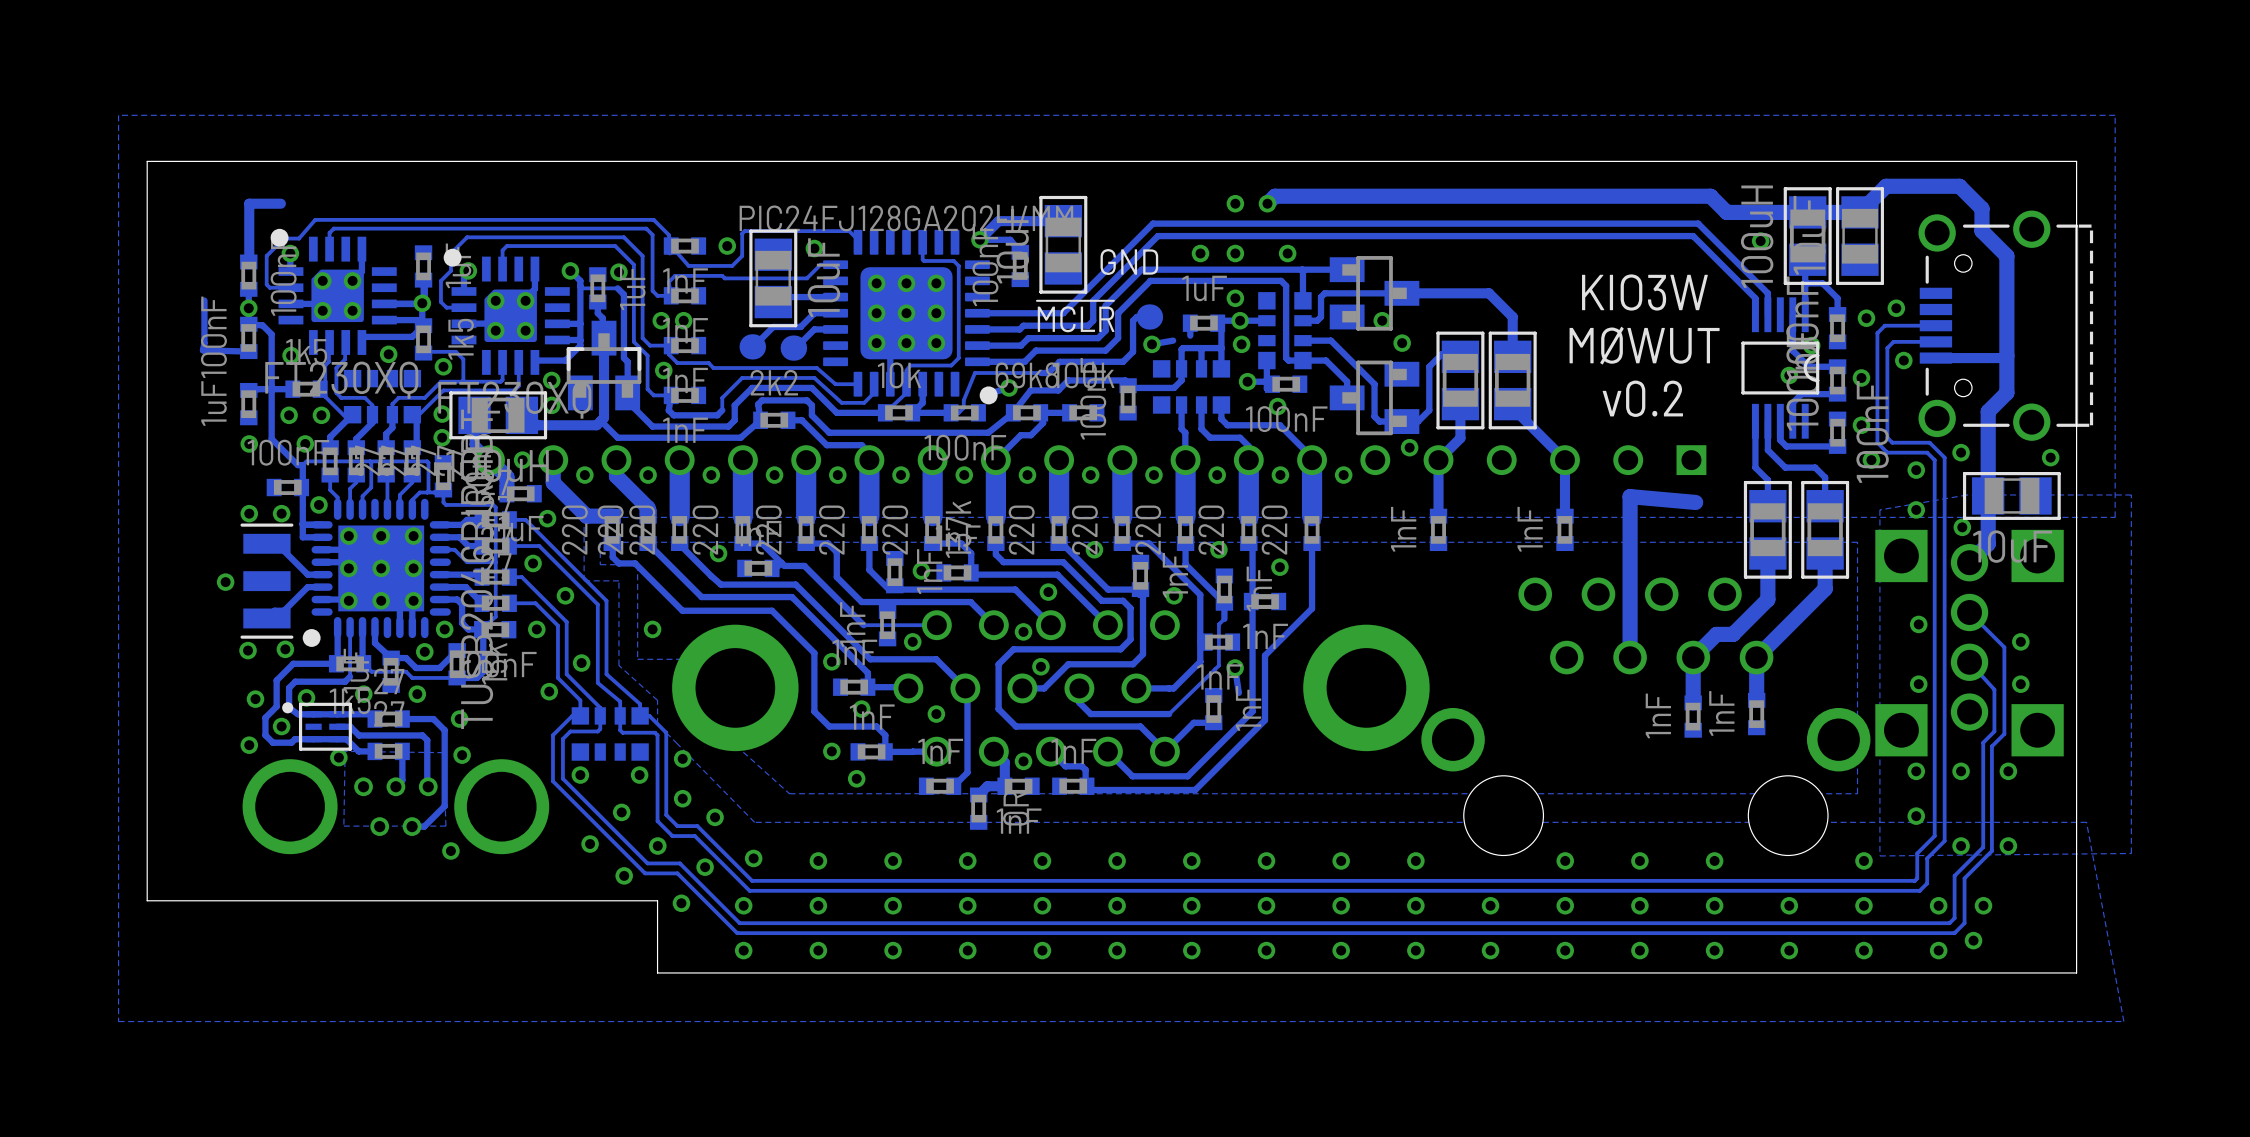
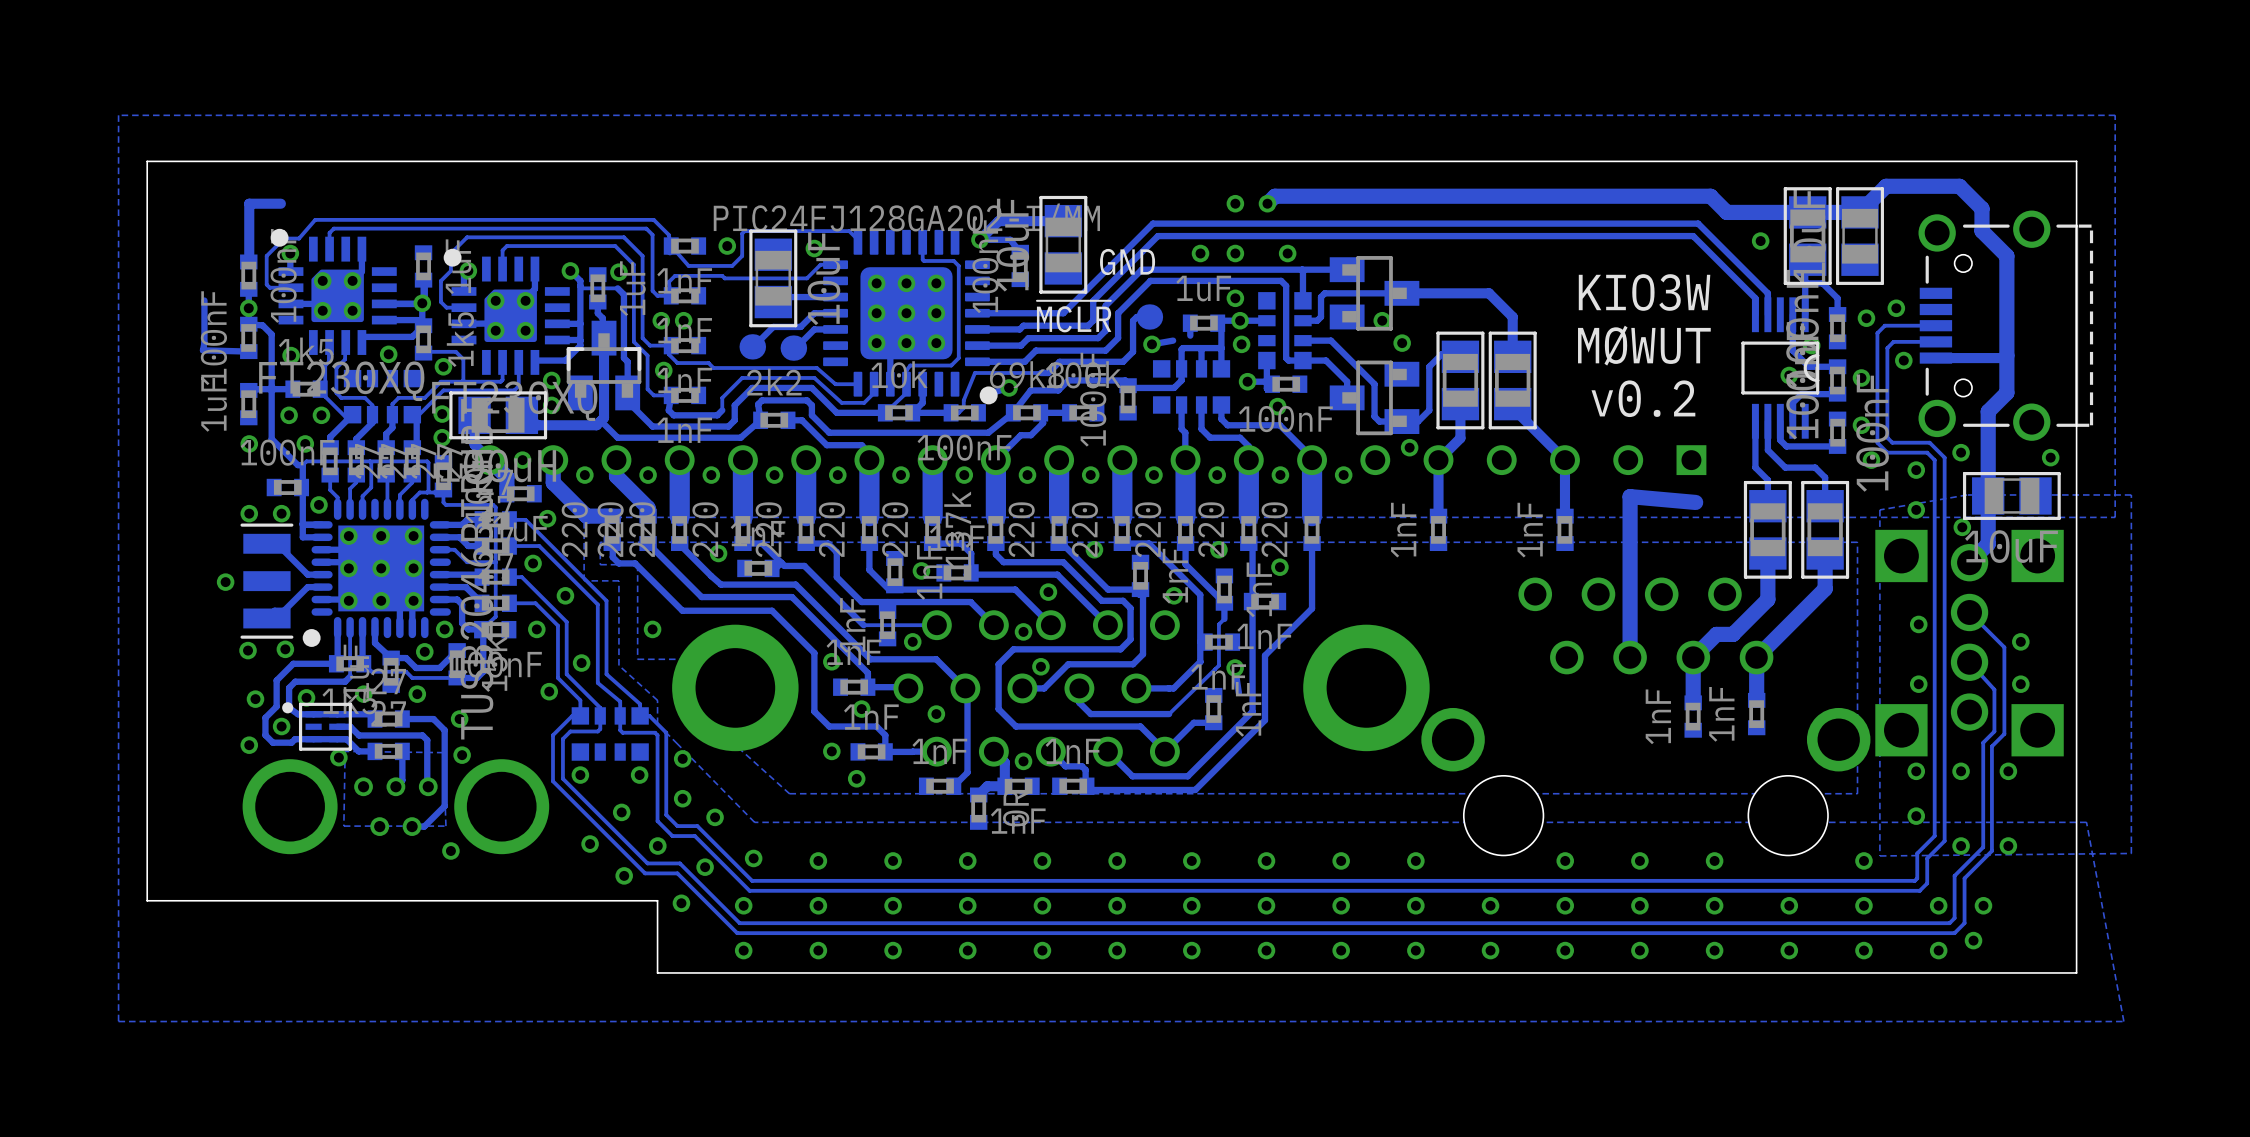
part value: 100uH (1757, 236) -> none

